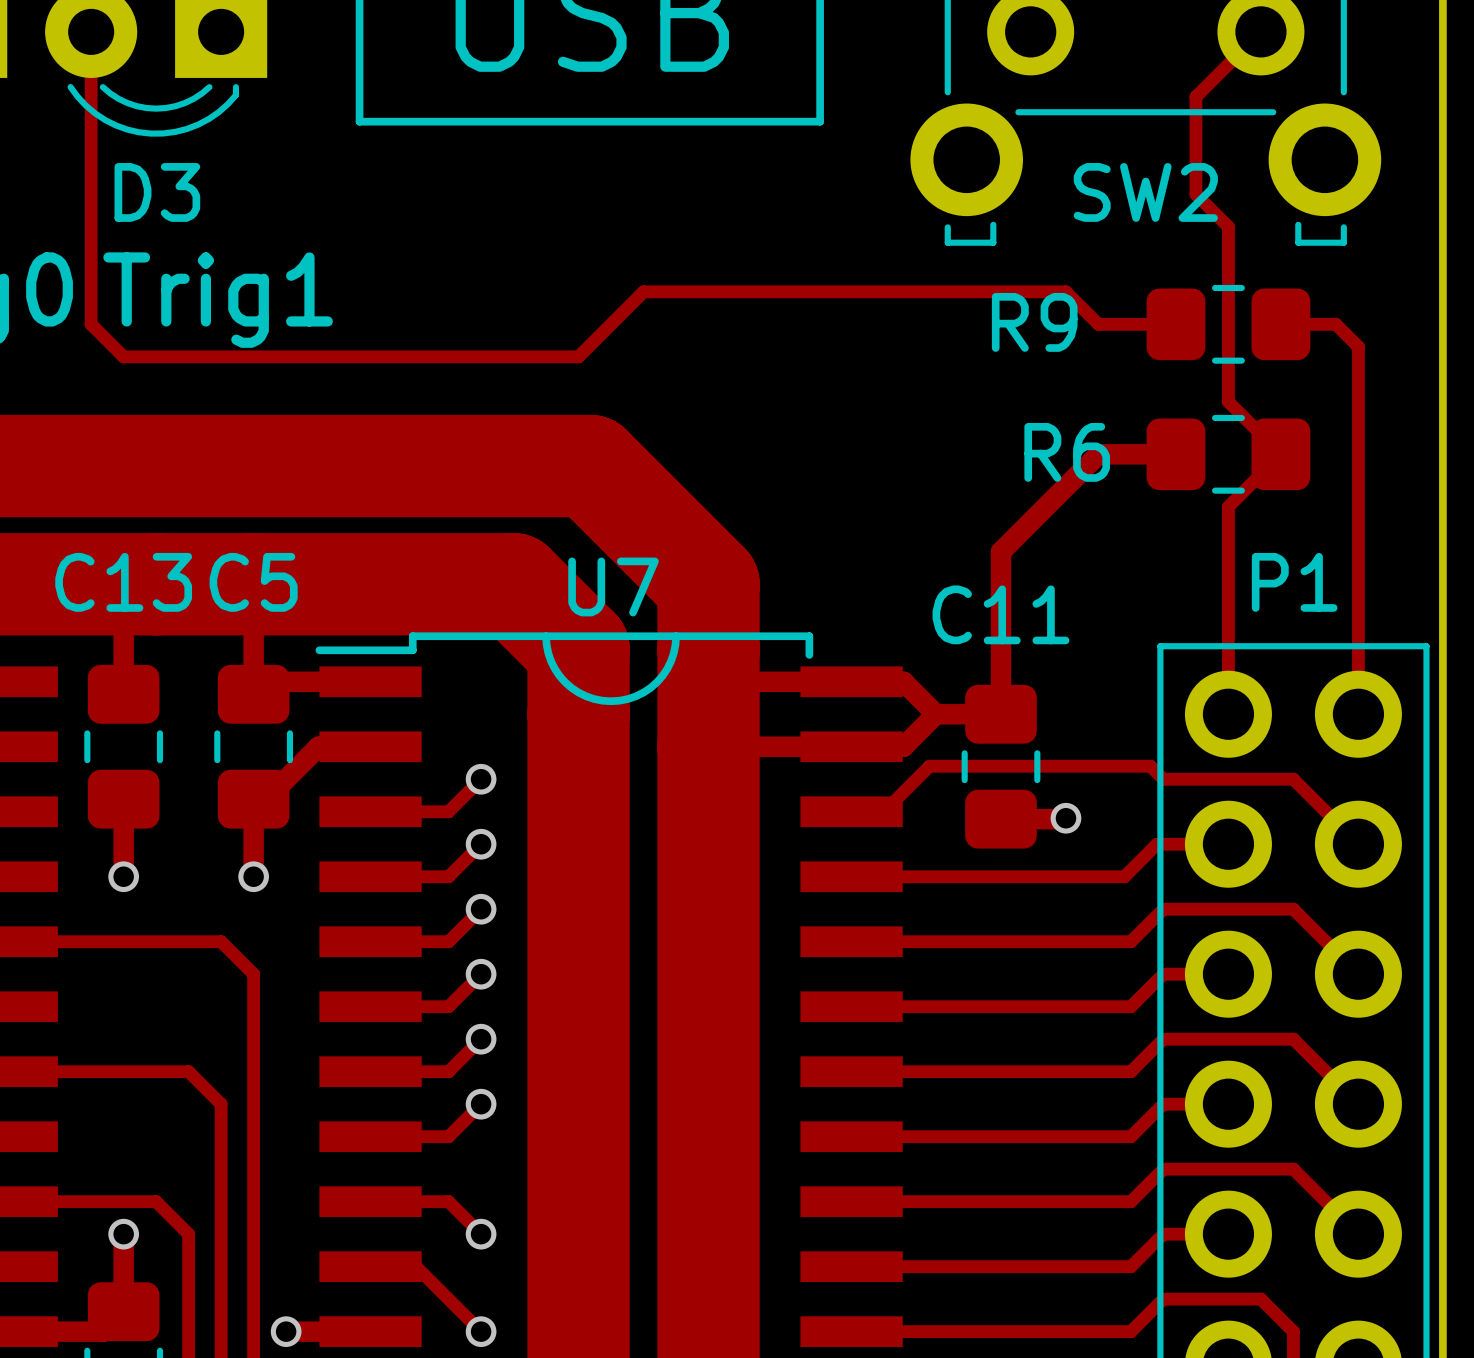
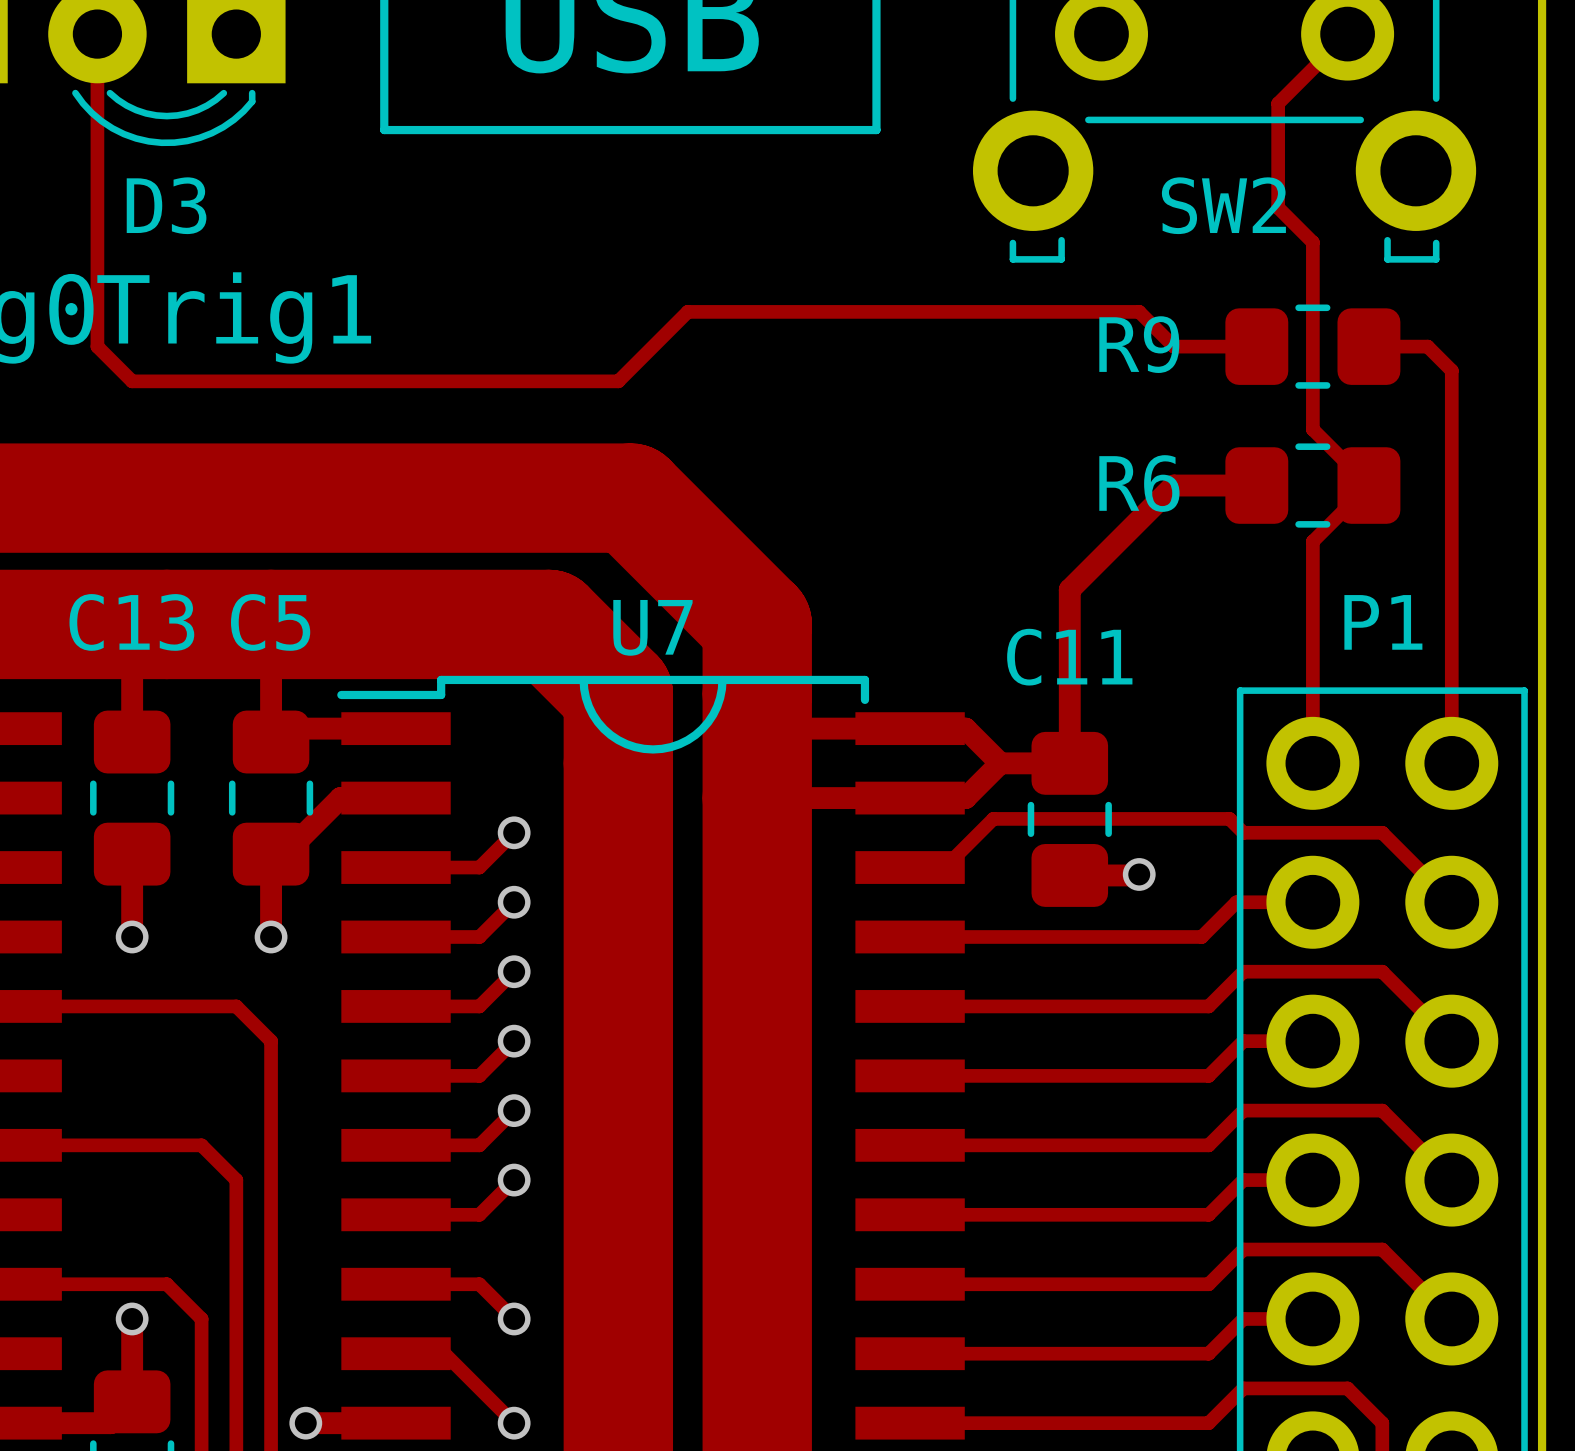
R9 name position: R9 (1034, 322) -> R9 (1139, 344)

